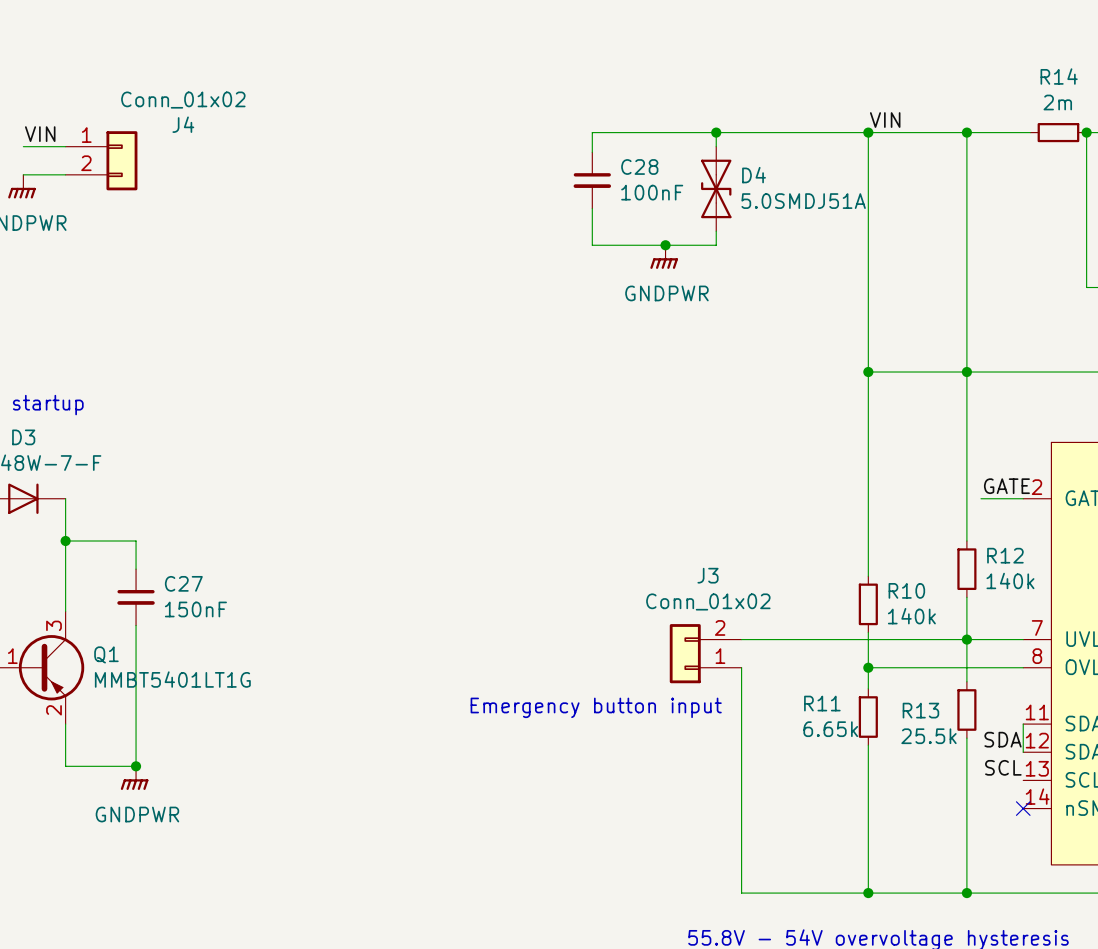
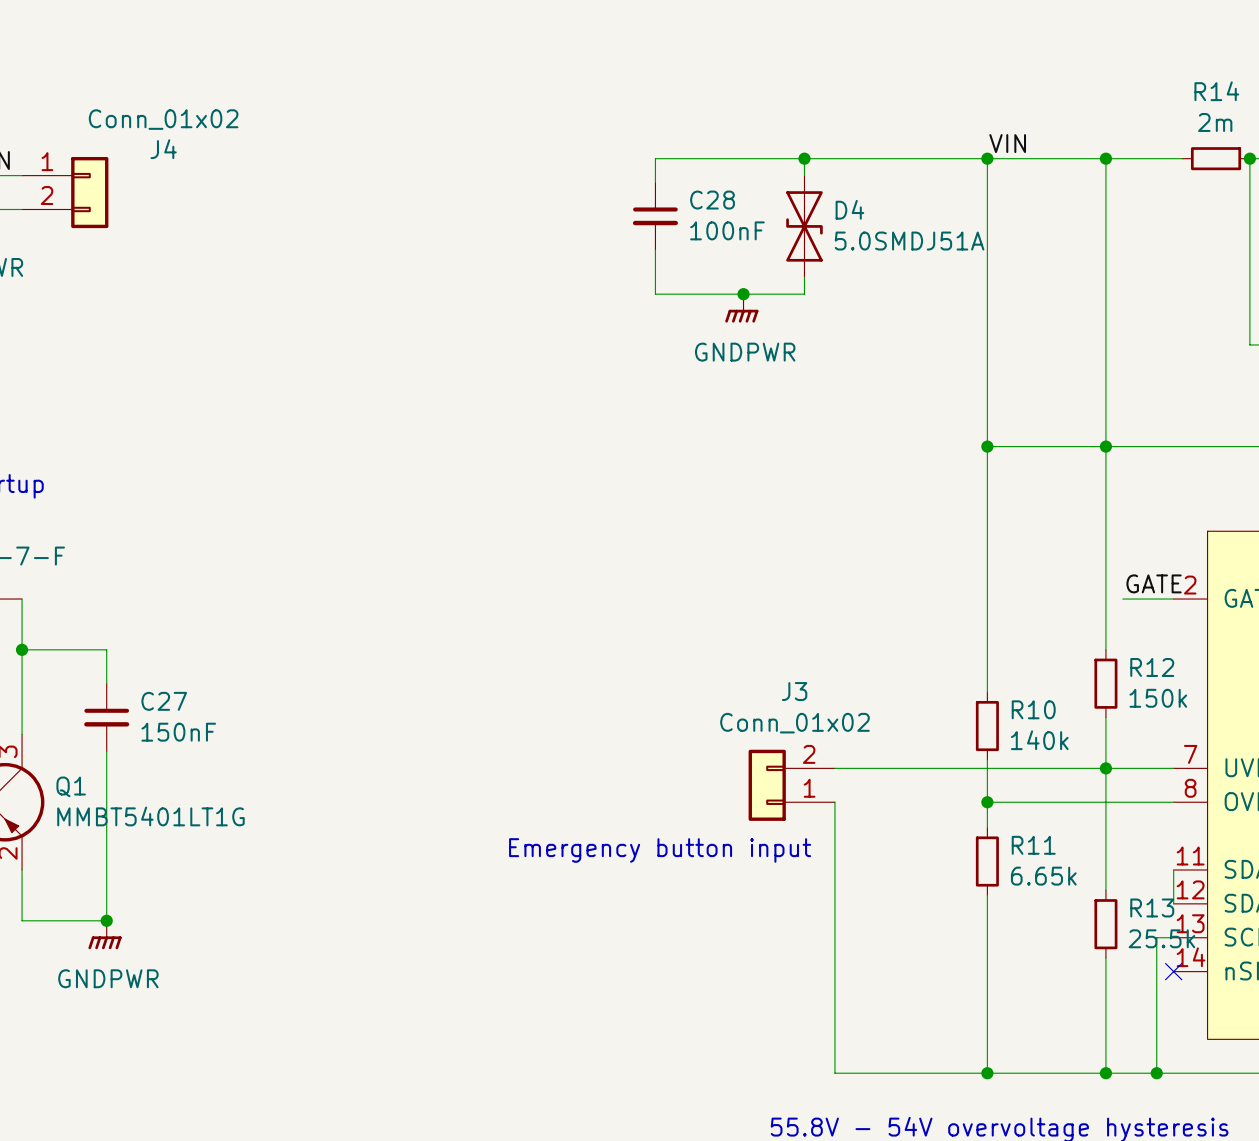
R12 value: 140k (1010, 580) -> 150k (1158, 698)
R11 name position: R11 (822, 703) -> R11 (1033, 845)
R13 position: (966, 709) -> (1105, 924)
R13 name position: R13 (920, 710) -> R13 (1152, 907)
R11 value position: 6.65k (830, 729) -> 6.65k (1043, 876)
R13 value position: 25.5k (928, 736) -> 25.5k (1161, 938)
label: SDA (1003, 739) -> none
wire: (966, 740) (966, 797) -> (1105, 819) (1105, 886)
label: SCL (1003, 767) -> none
wire: none -> (1173, 937) (1156, 937) (1156, 1073)
junction: none -> (1156, 1073)

